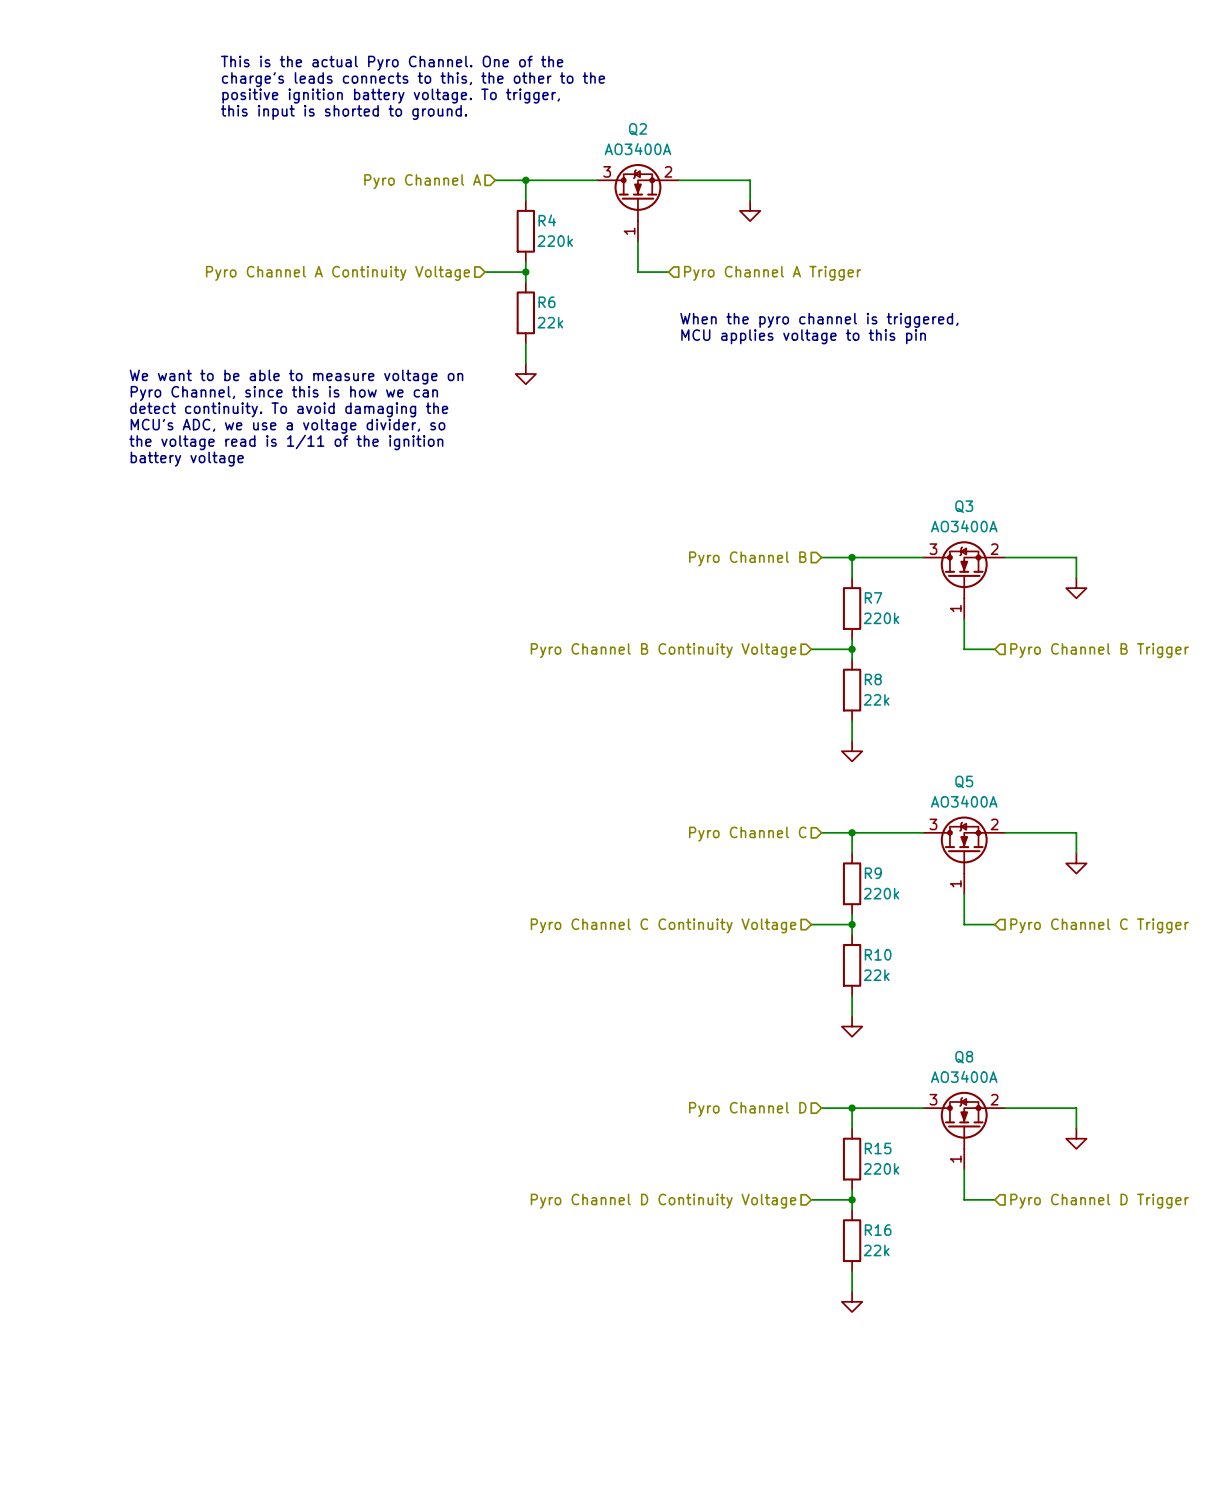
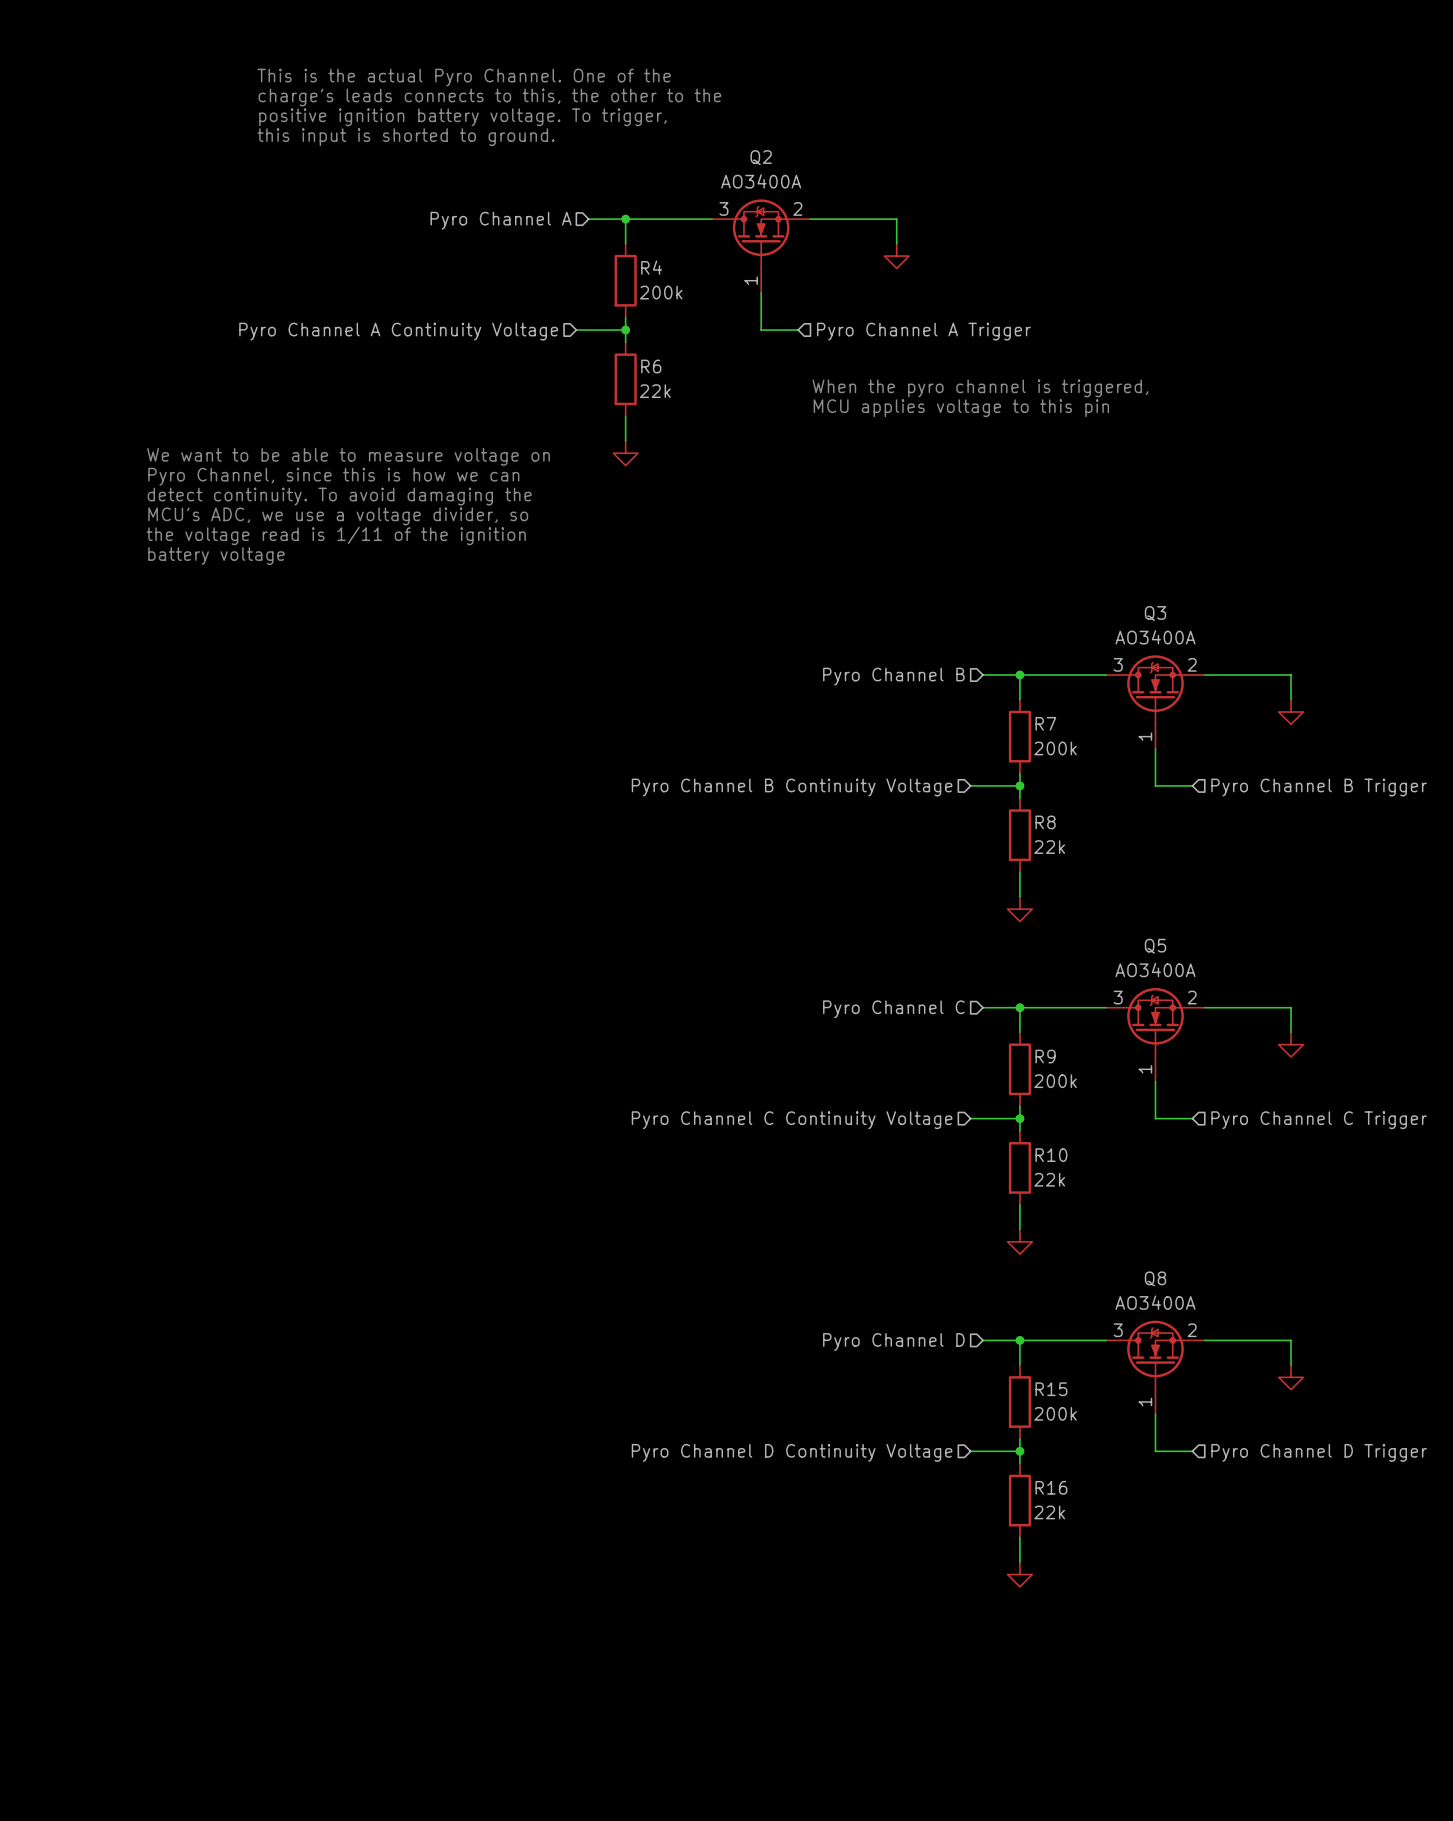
R4 value: 220k (555, 241) -> 200k (661, 292)
R7 value: 220k (881, 618) -> 200k (1055, 748)
R9 value: 220k (881, 893) -> 200k (1055, 1081)
R15 value: 220k (881, 1168) -> 200k (1055, 1413)

